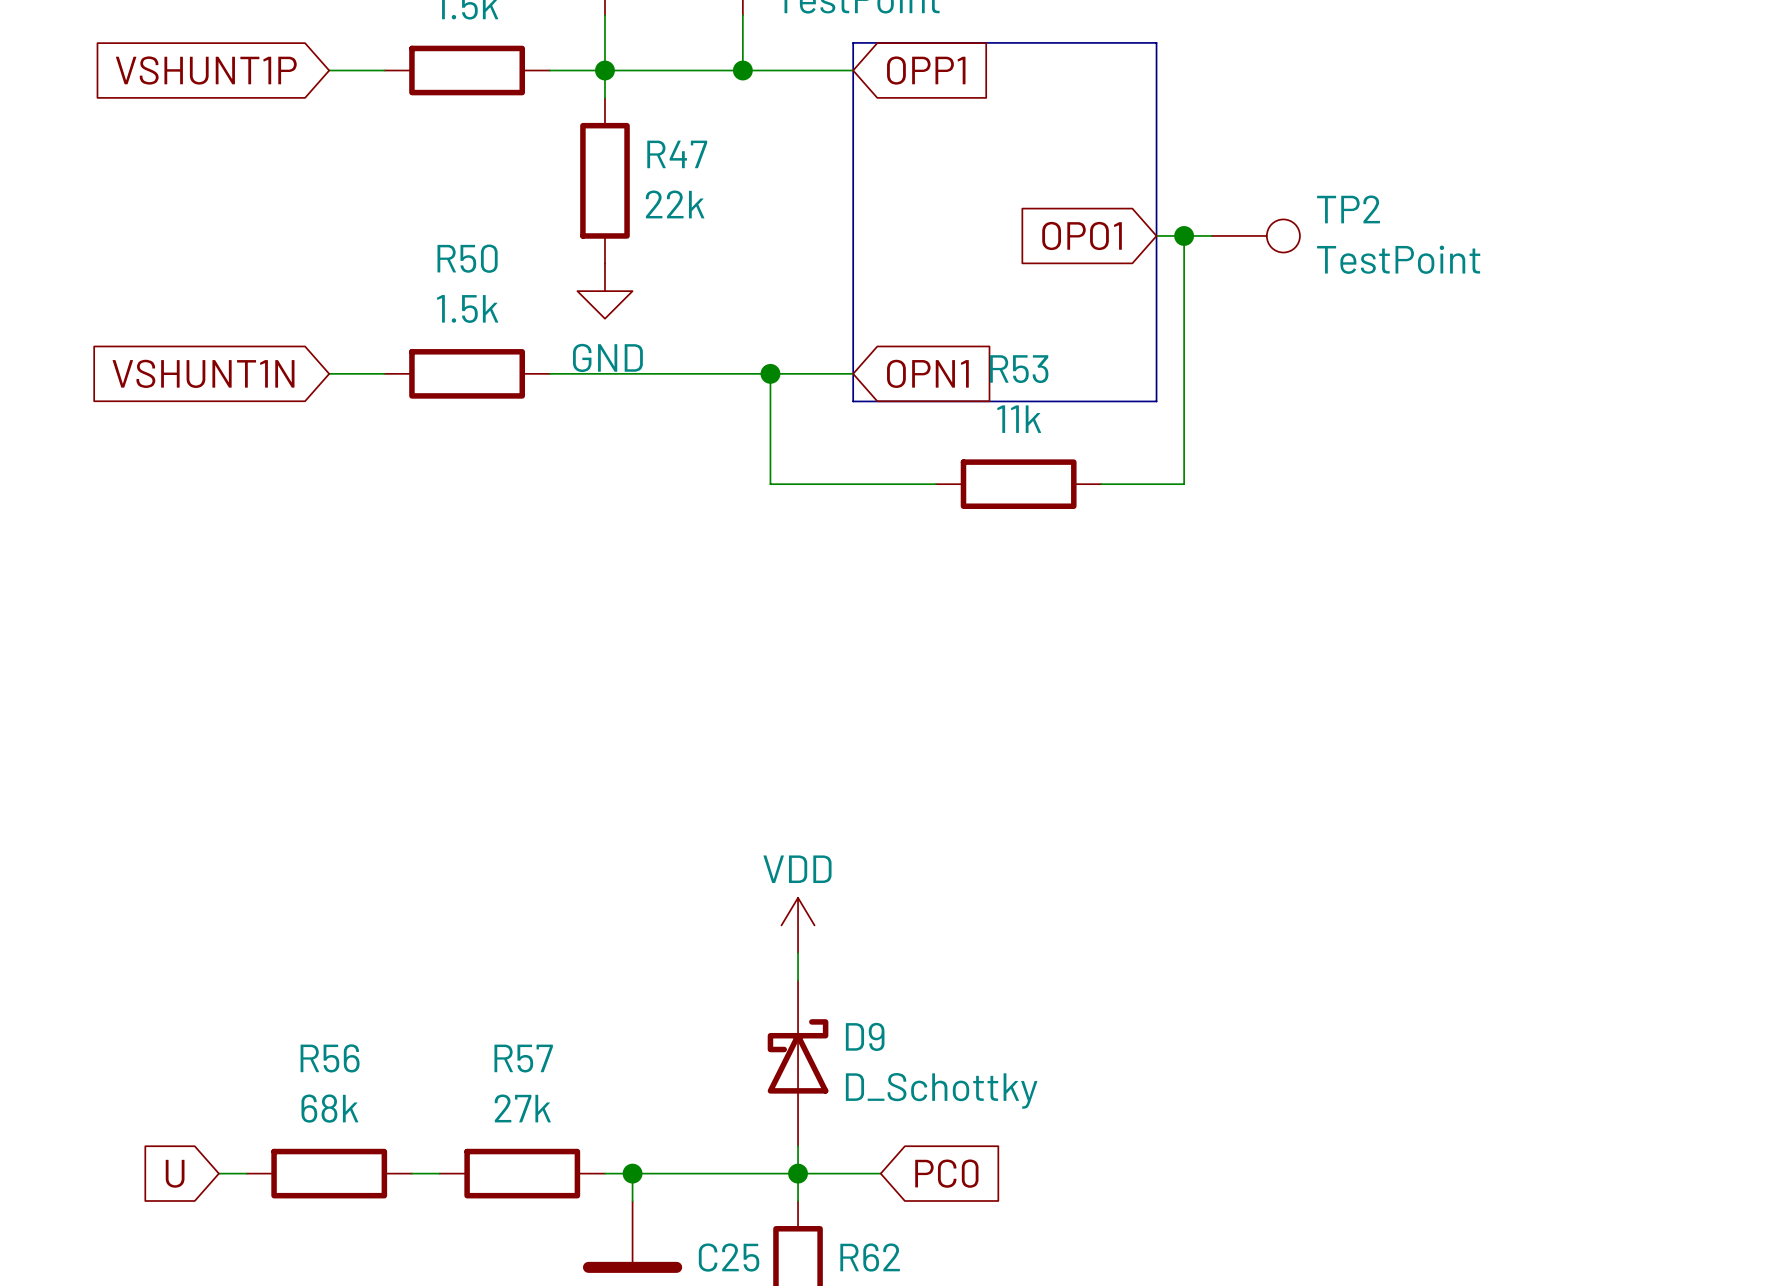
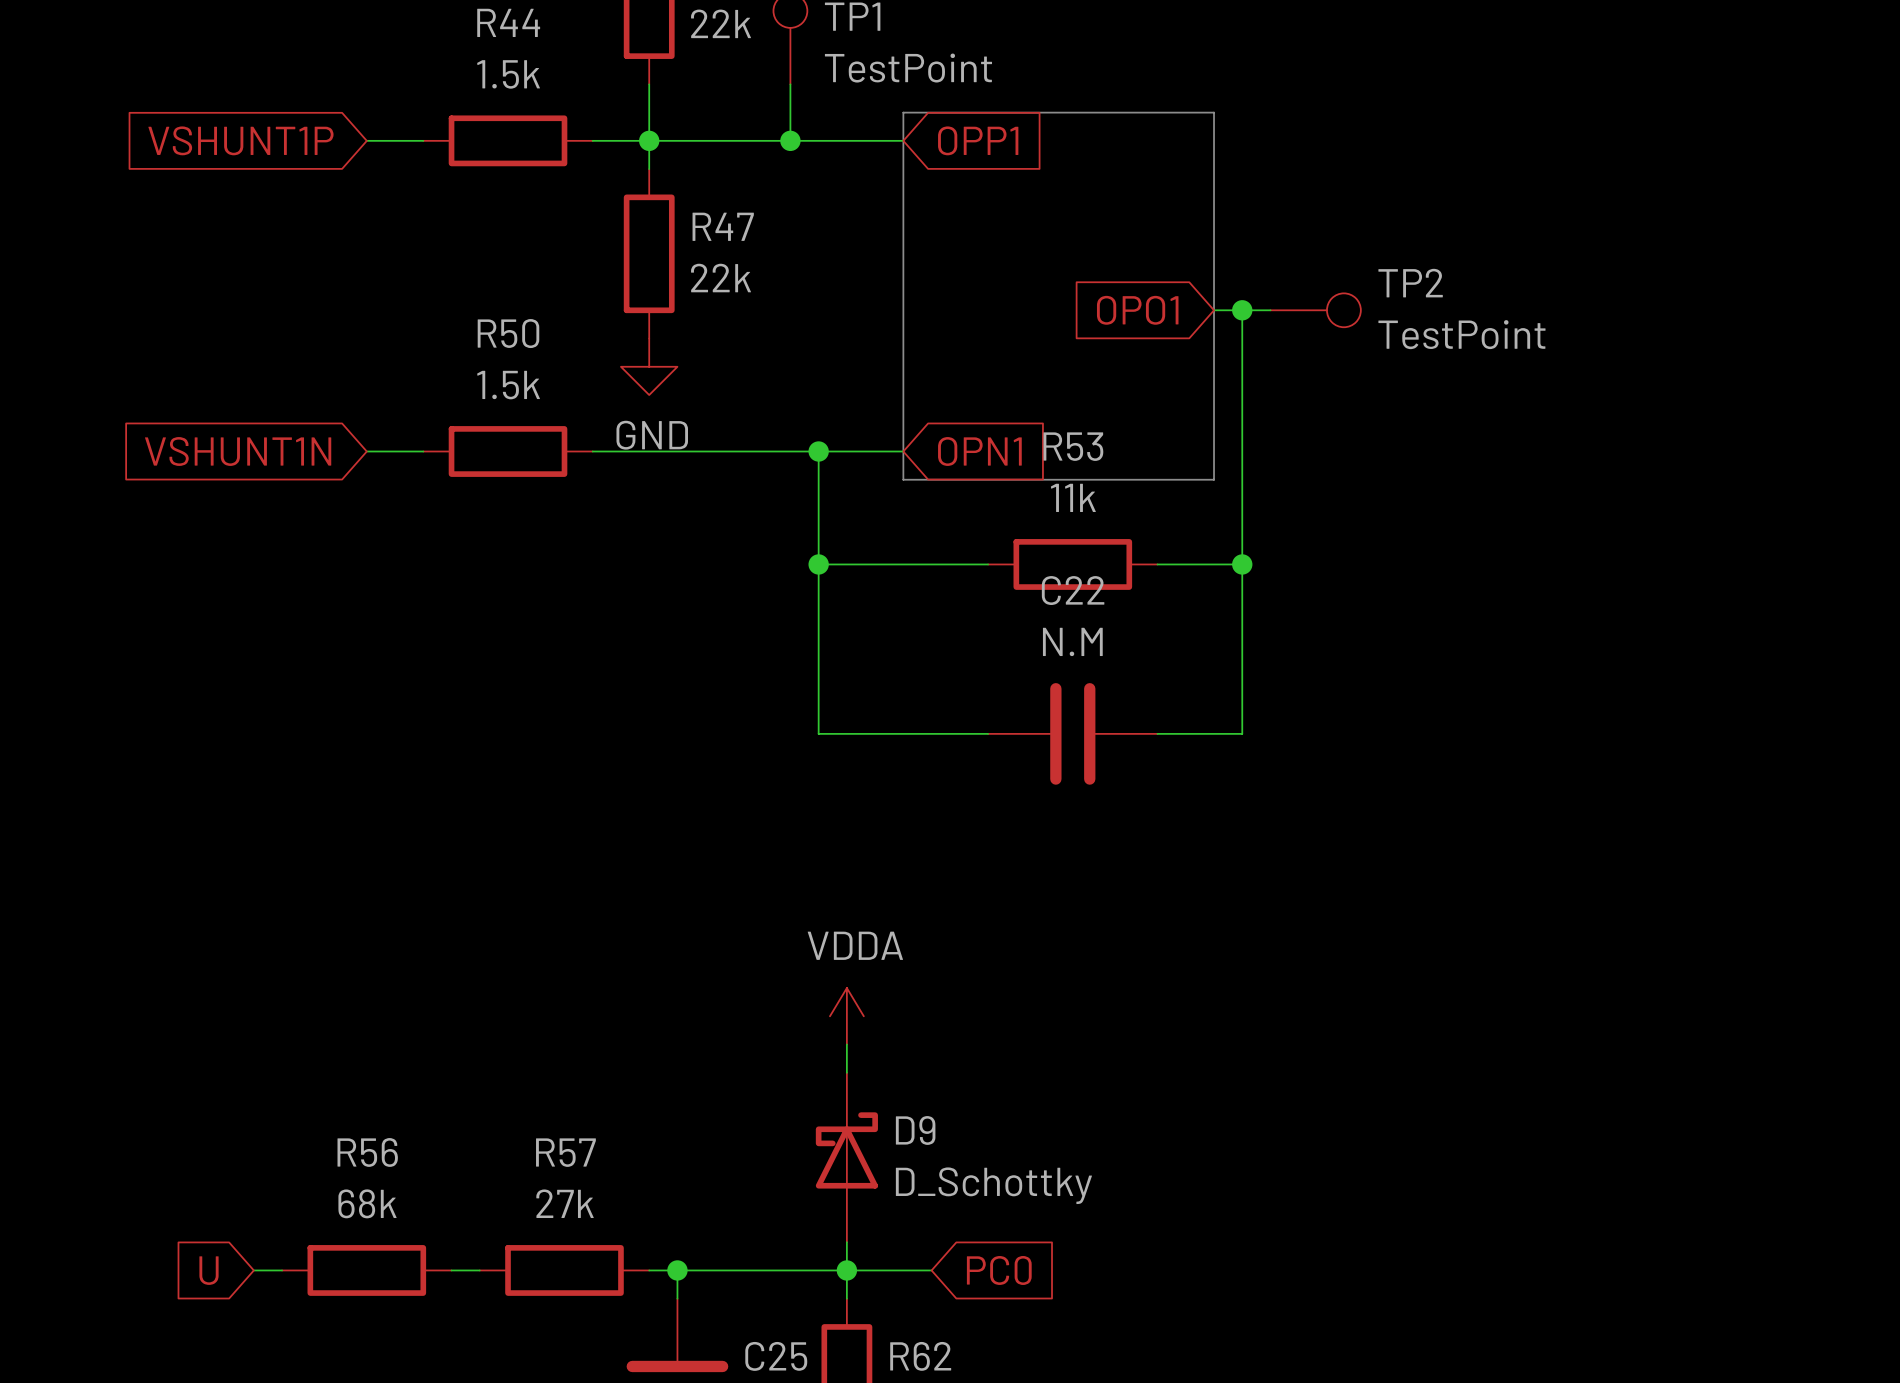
wire: none -> (818, 564) (818, 733) (988, 733)
junction: none -> (818, 564)
wire: none -> (1242, 564) (1242, 733) (1157, 733)
junction: none -> (1242, 564)
C22: none -> N.M (1072, 733)
power symbol: VDD (798, 925) -> VDDA (846, 1016)

